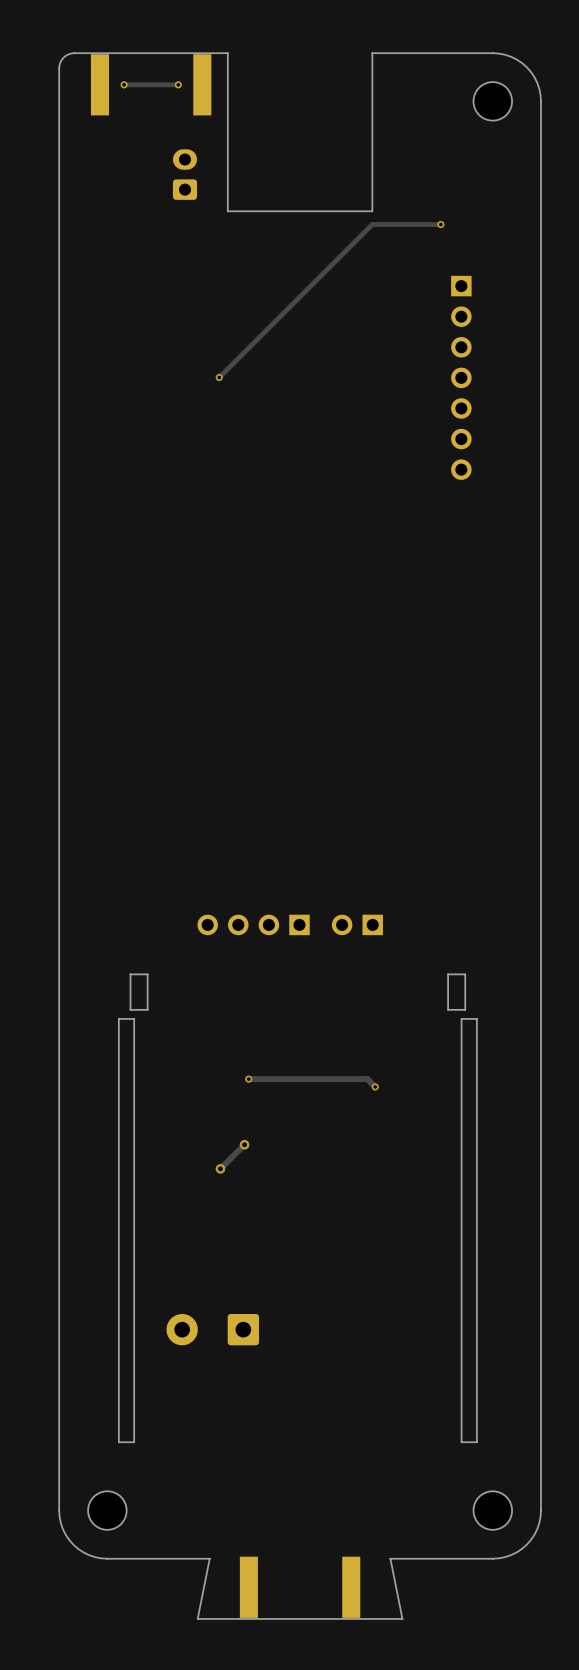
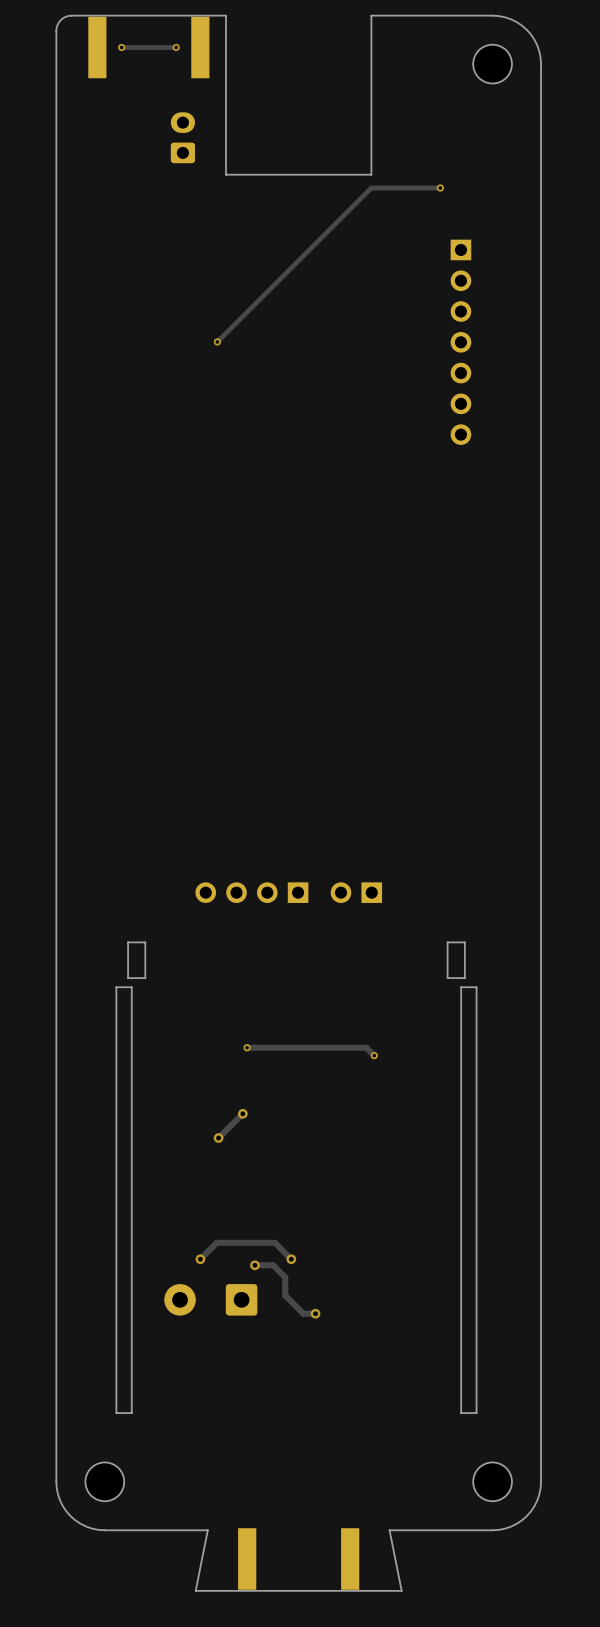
via: none -> (200, 1259)
track: none -> (291, 1259) (274, 1242) (216, 1242) (200, 1259)
via: none -> (291, 1259)
track: none -> (254, 1265) (273, 1265) (285, 1277) (285, 1295) (303, 1313) (315, 1313)
via: none -> (254, 1265)
via: none -> (315, 1313)

